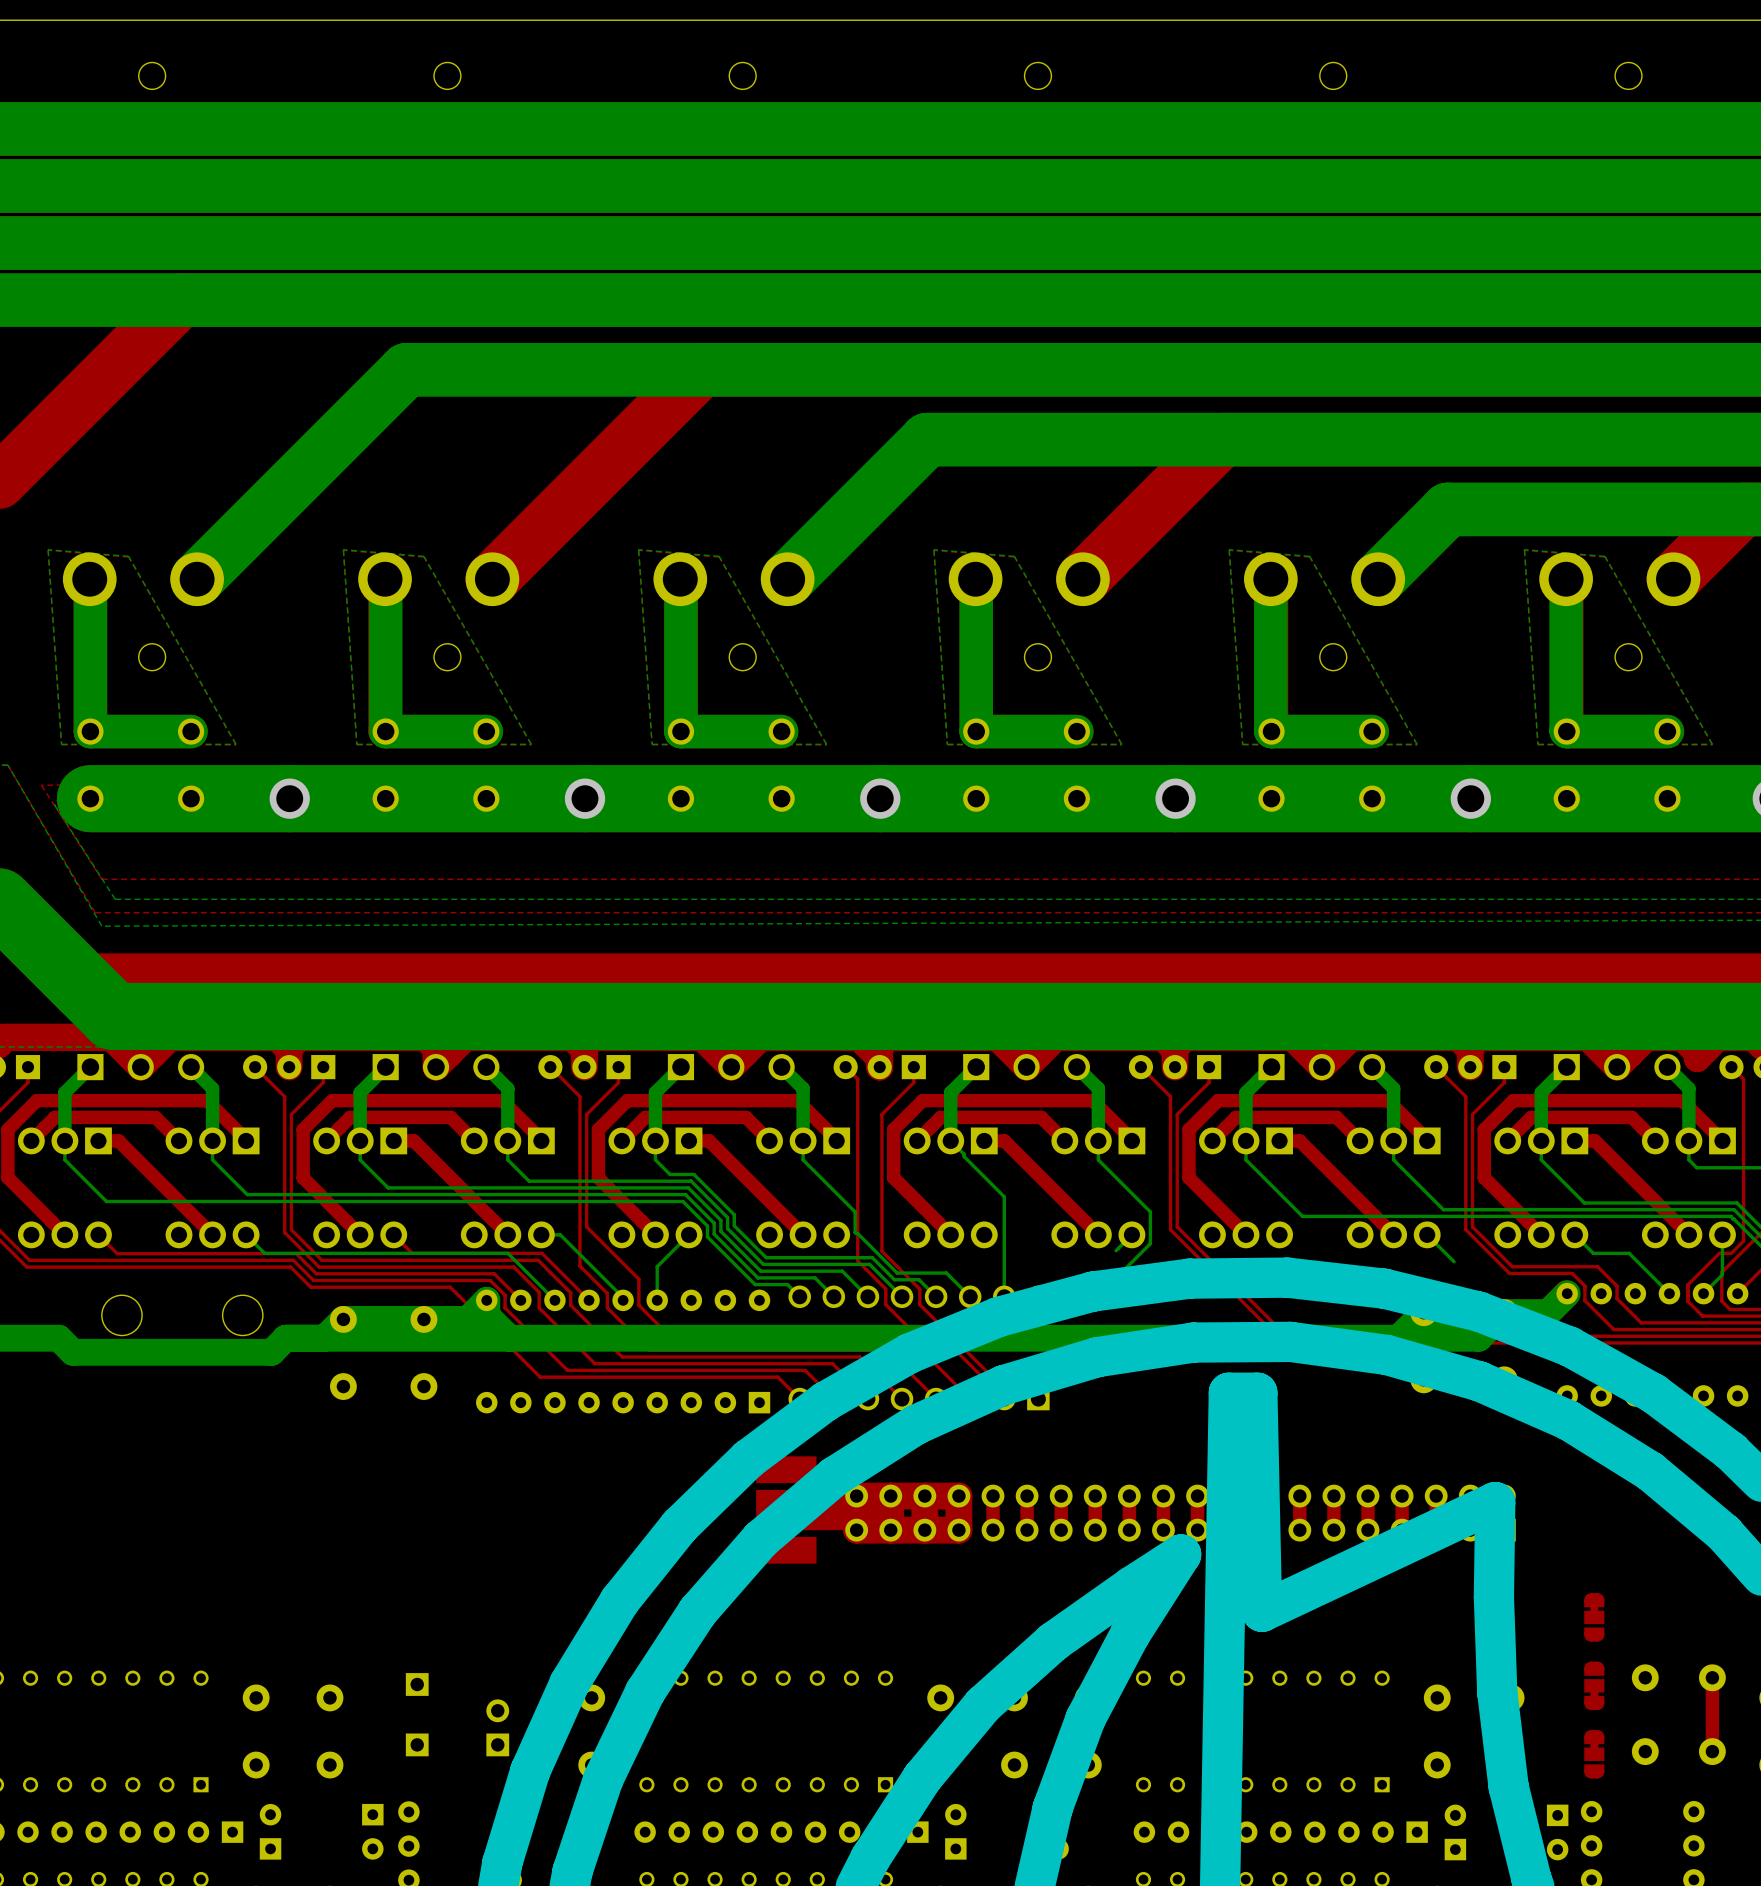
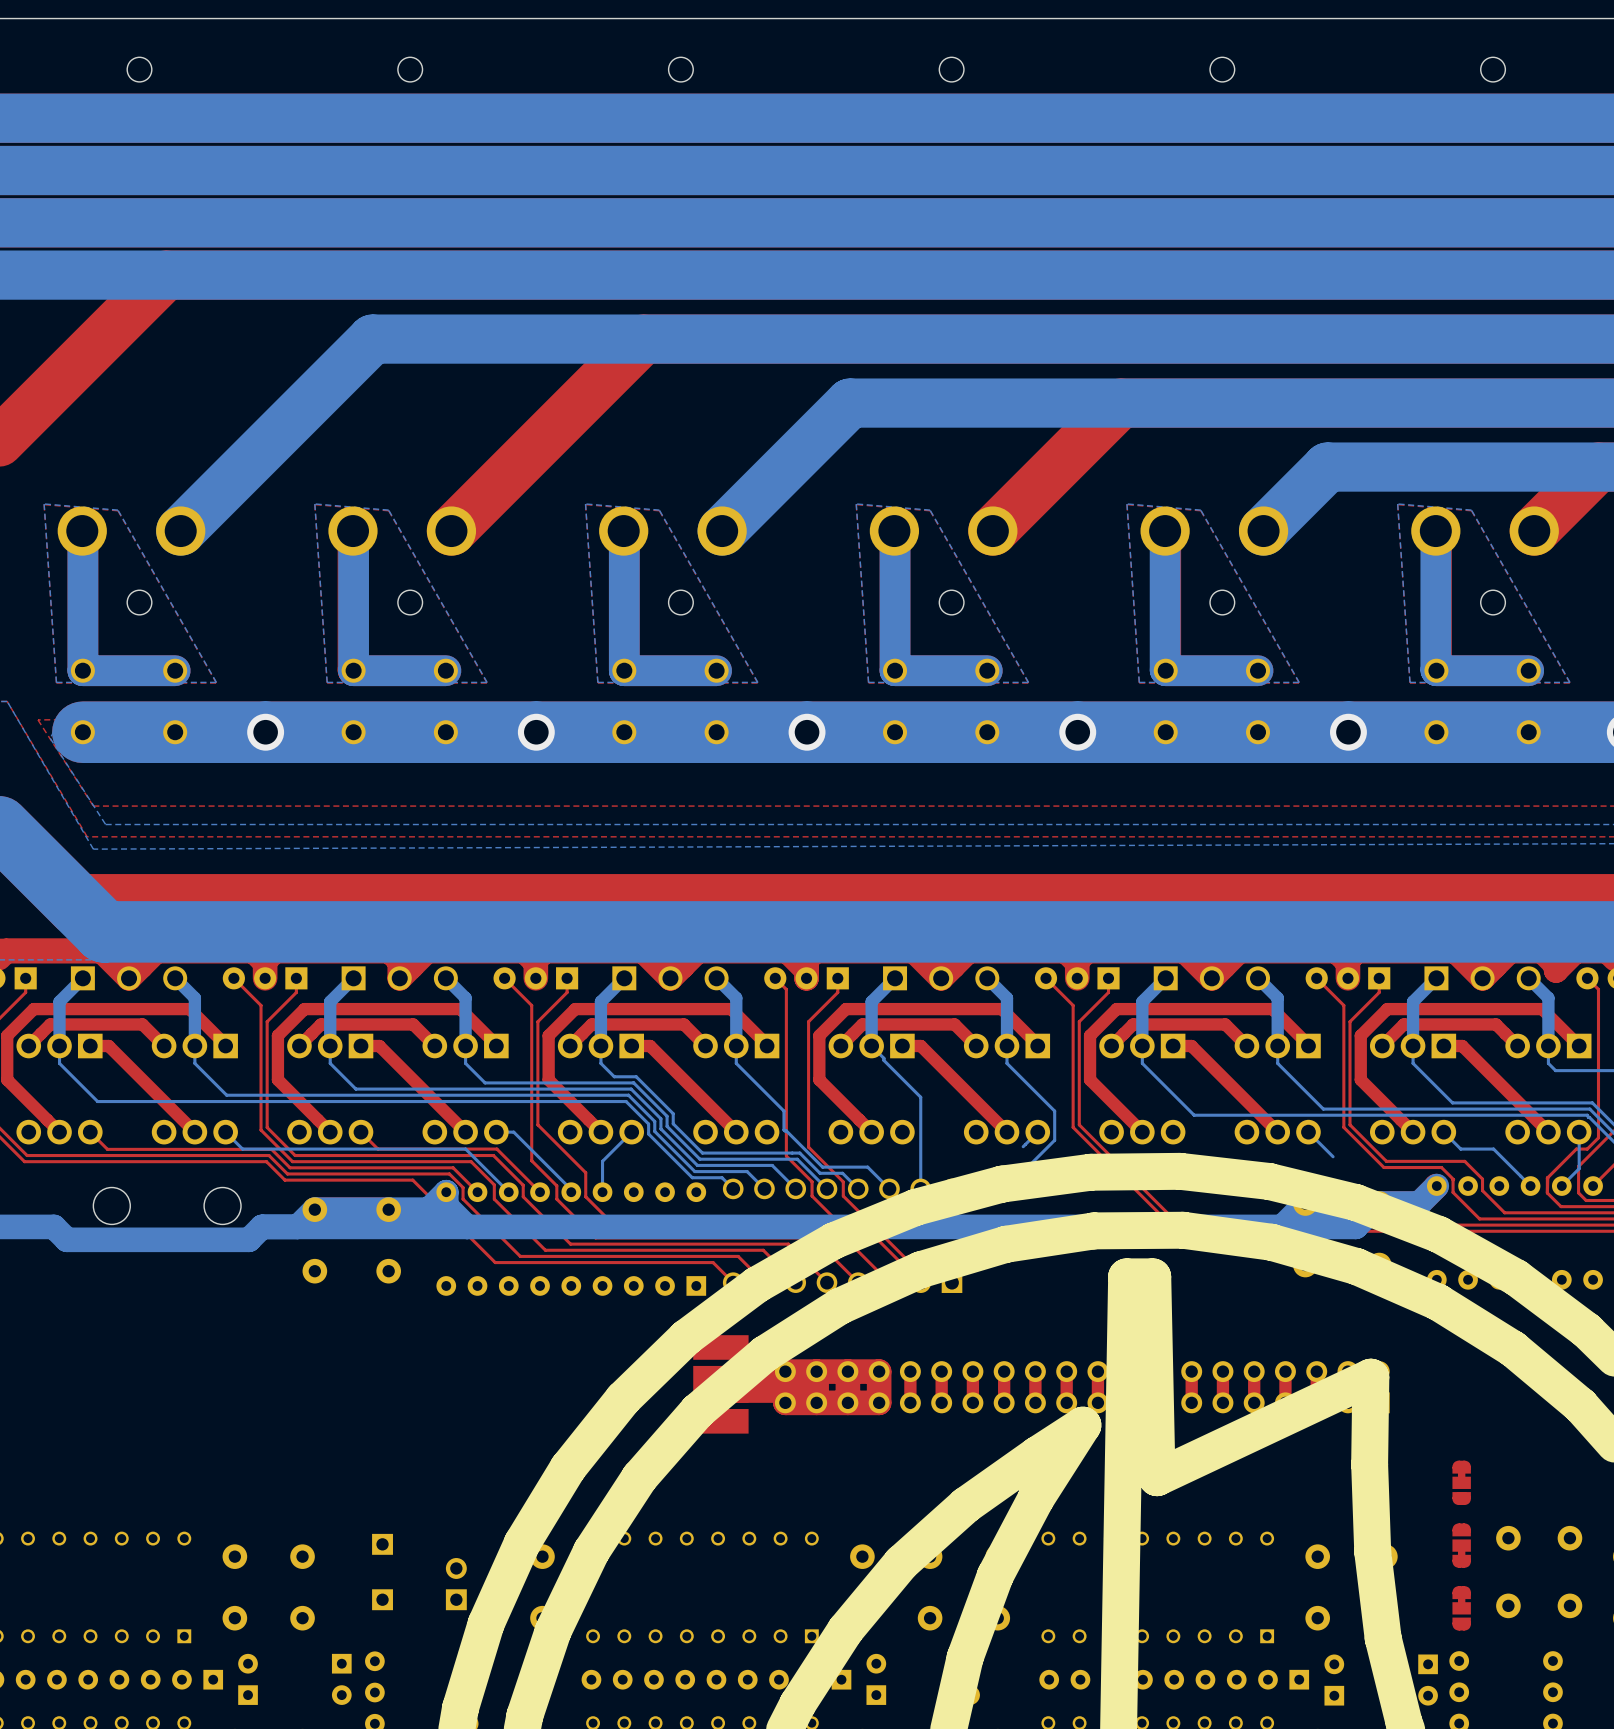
top track: (1712, 1677) (1712, 1751) -> none

